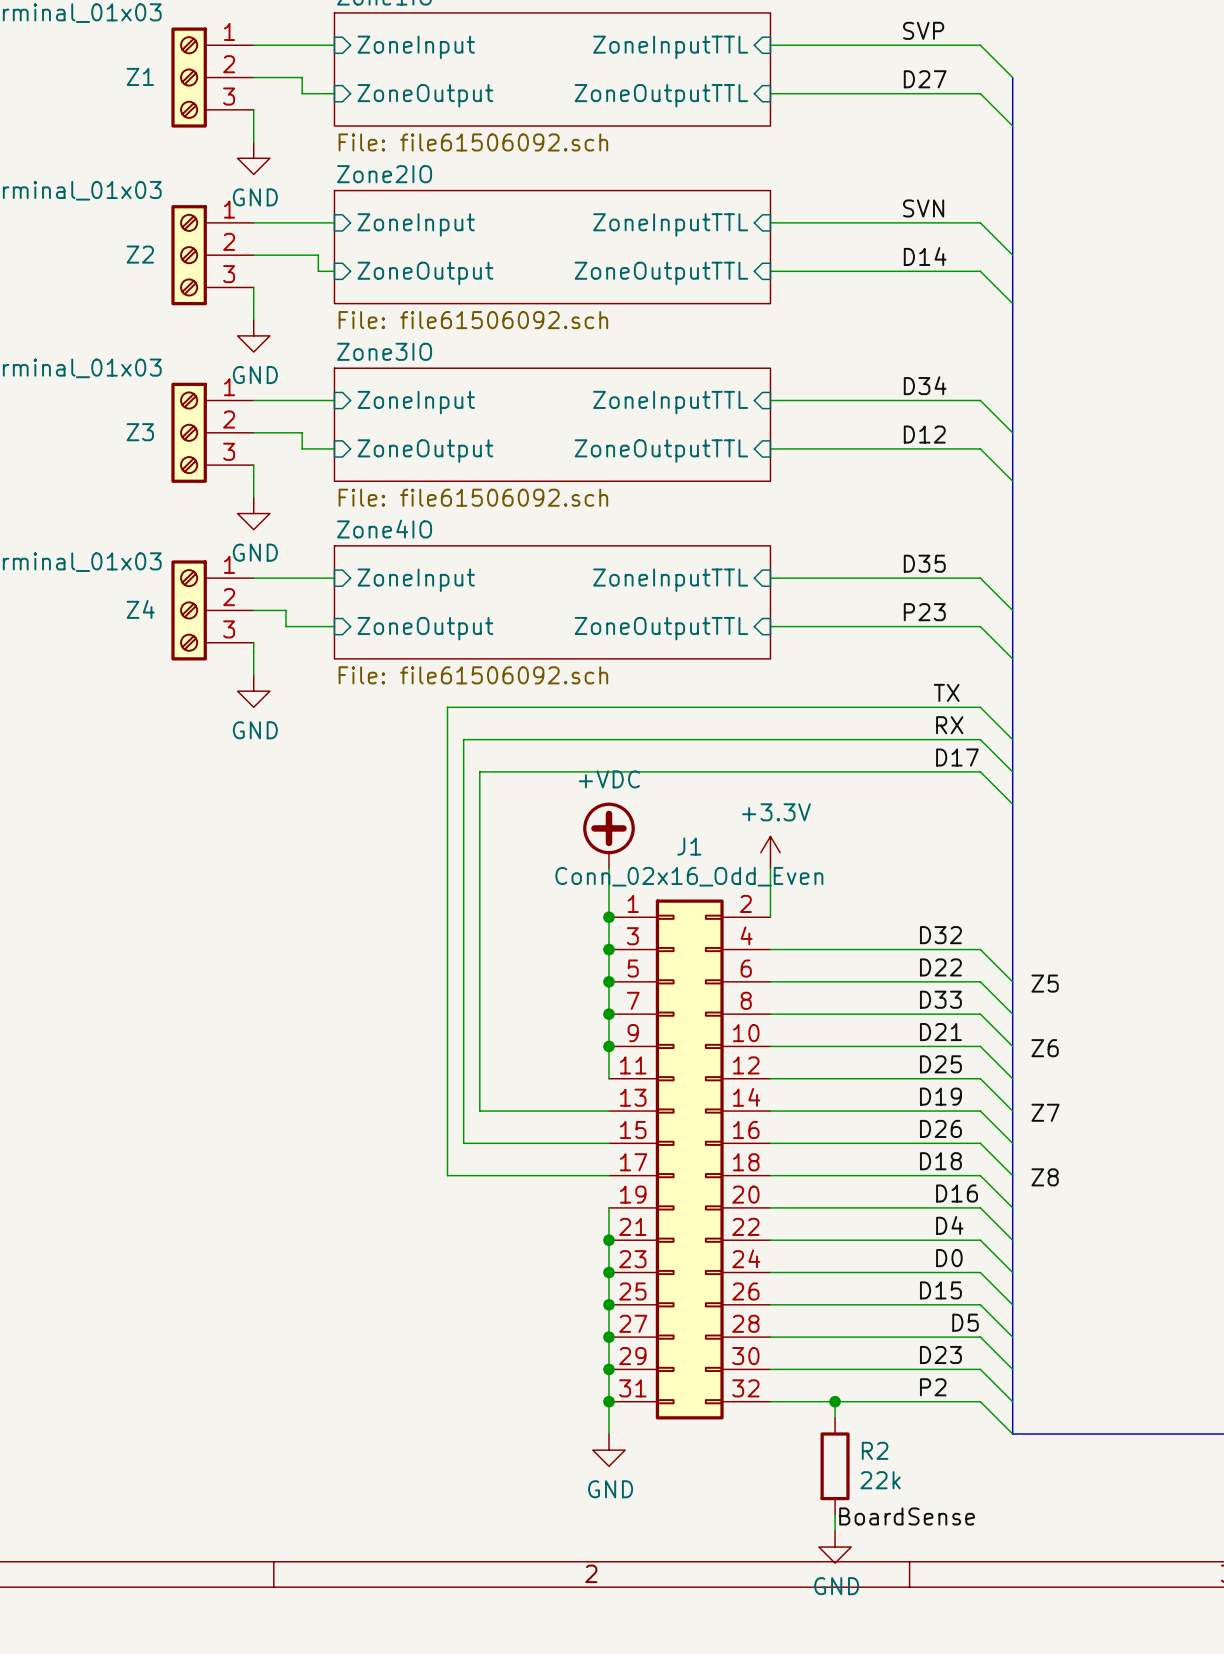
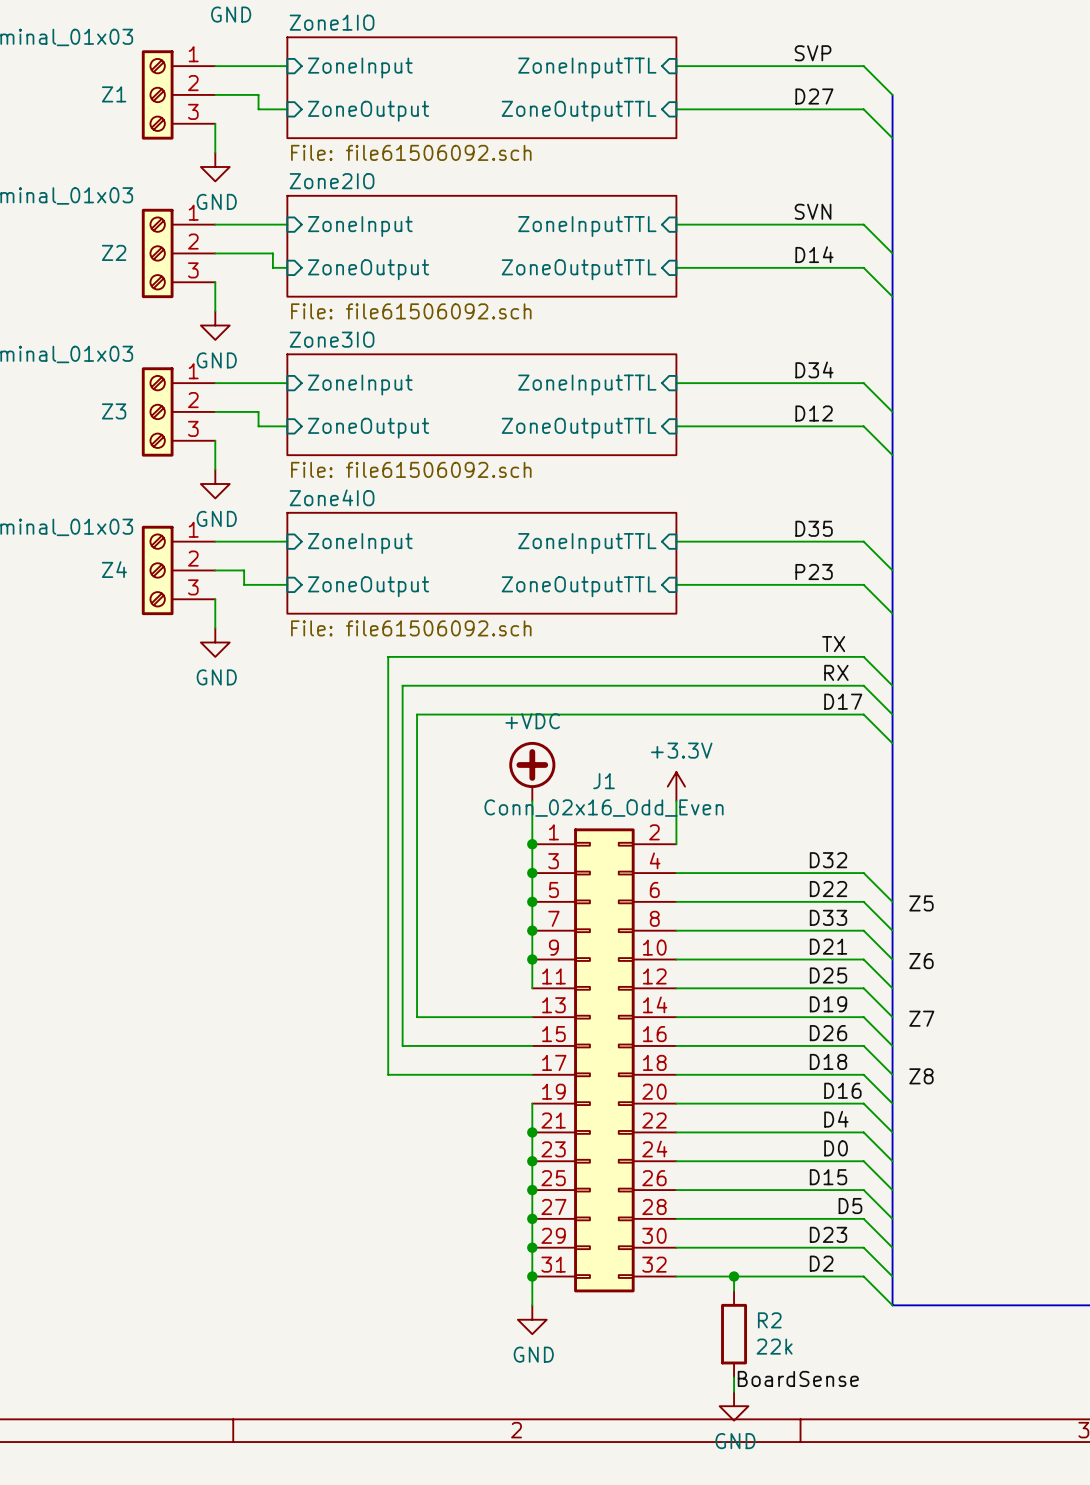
label: P2 (933, 1387) -> D2 (821, 1263)

